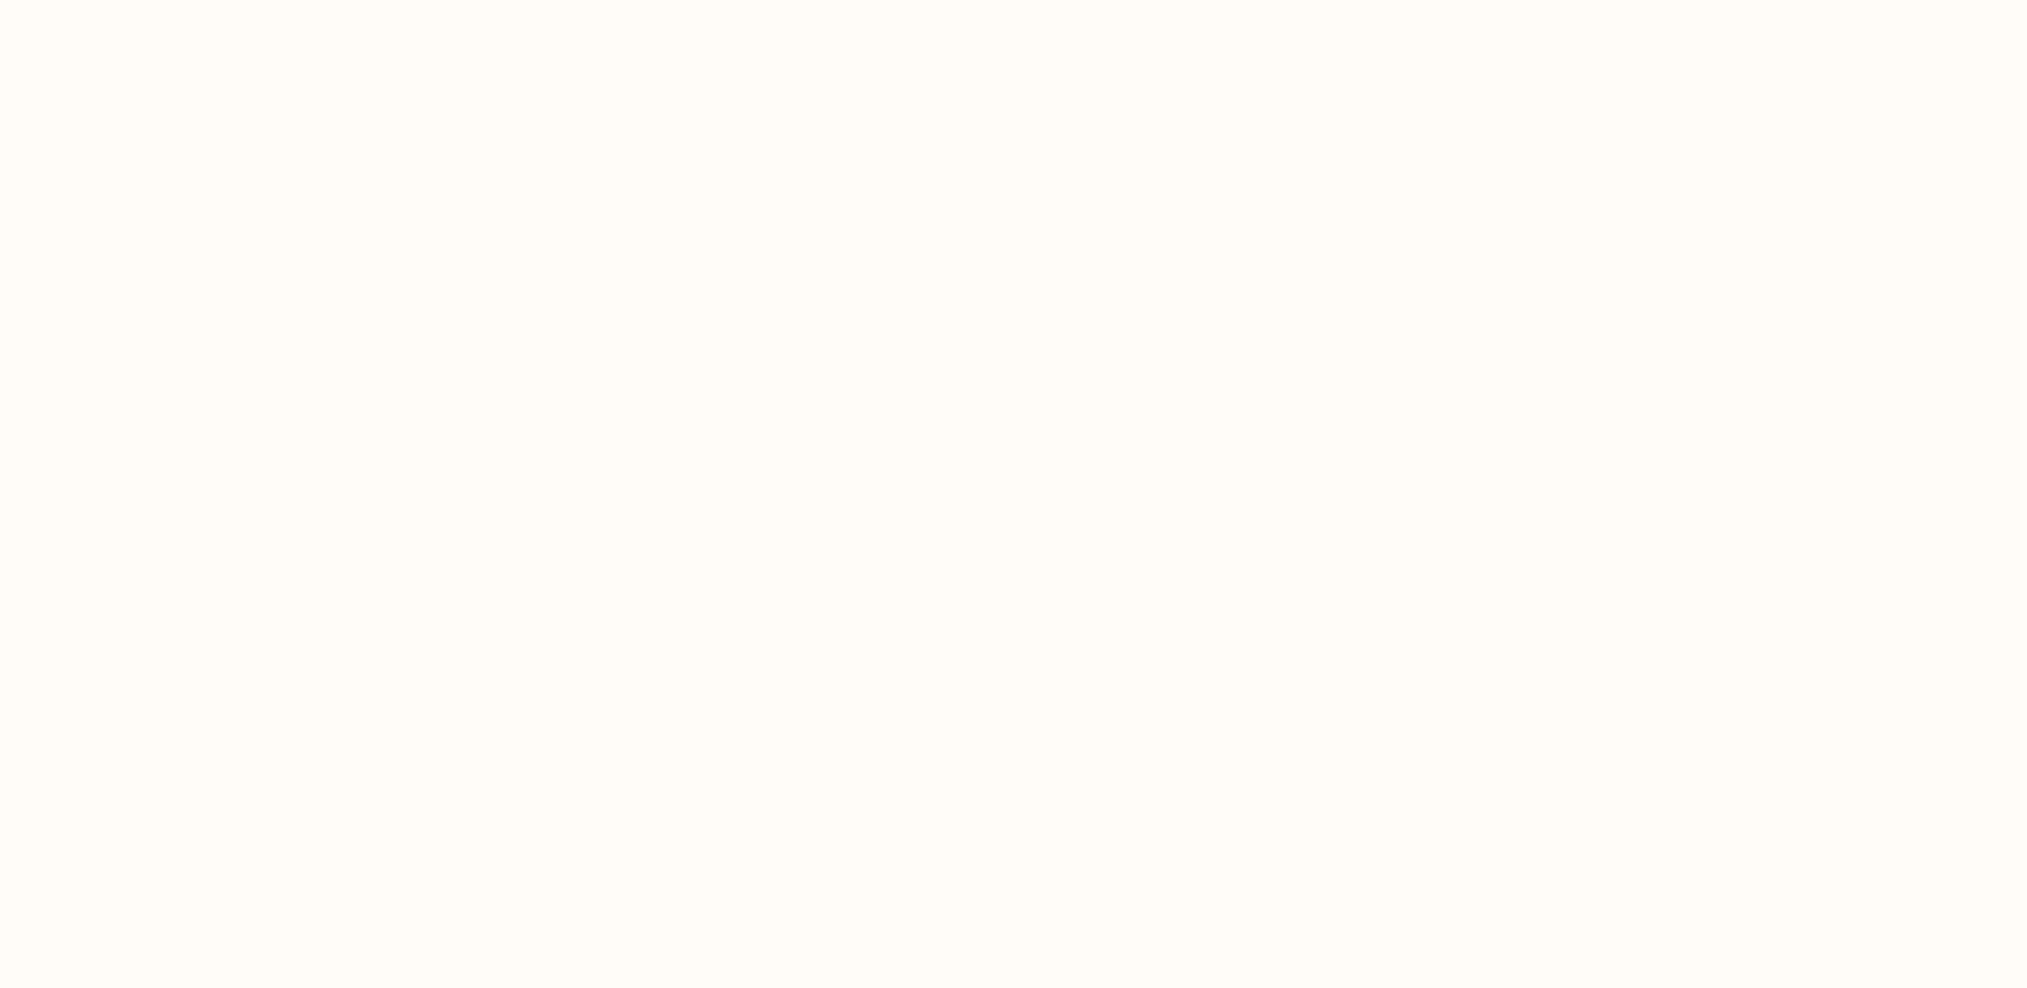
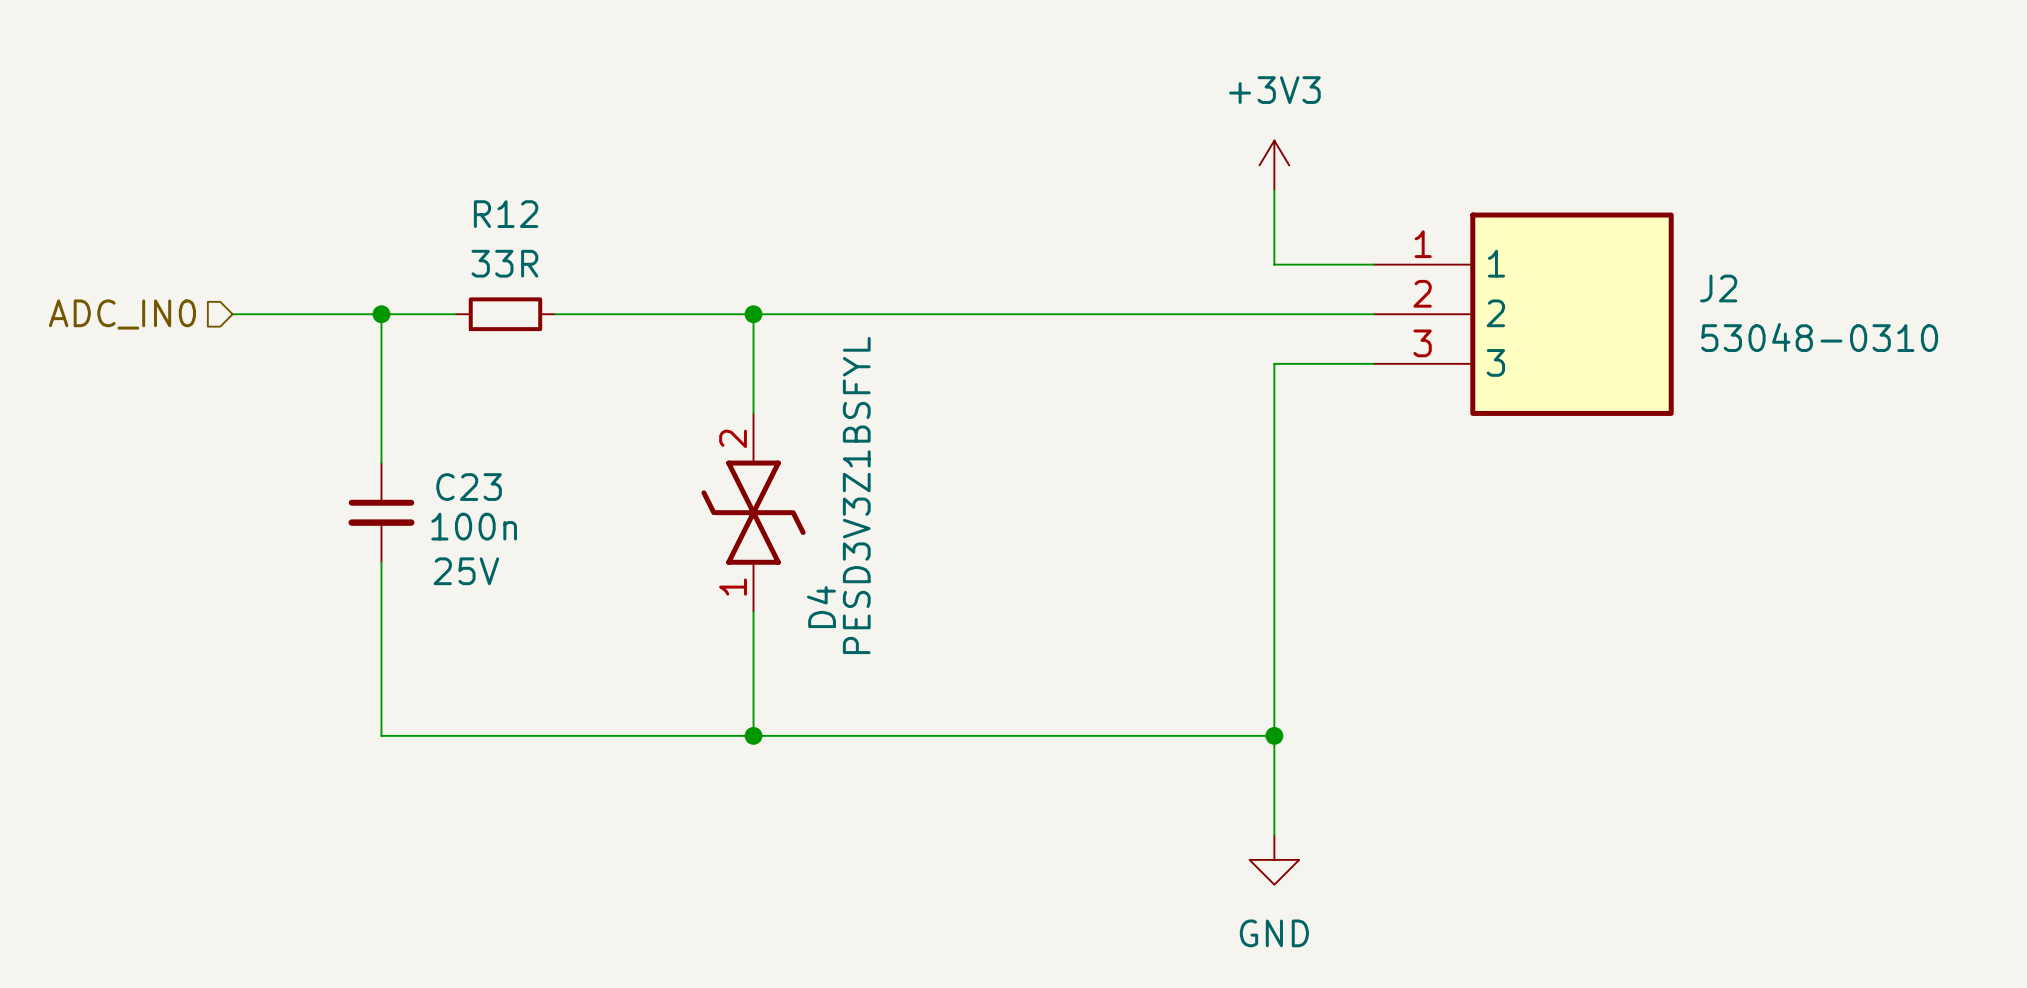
power symbol: none -> +3V3 (1274, 165)
wire: none -> (1274, 190) (1274, 264) (1373, 264)
wire: none -> (232, 314) (455, 314)
wire: none -> (381, 314) (381, 463)
junction: none -> (381, 314)
R12: none -> 33R (505, 314)
wire: none -> (555, 314) (1373, 314)
wire: none -> (753, 314) (753, 413)
junction: none -> (753, 314)
J2: none -> 53048-0310 (1523, 314)
hierarchical label: none -> ADC_IN0 (122, 314)
wire: none -> (1373, 363) (1274, 363) (1274, 835)
C23: none -> 100n (381, 512)
D4: none -> PESD3V3Z1BSFYL (753, 512)
wire: none -> (381, 562) (381, 735) (1274, 735)
wire: none -> (753, 611) (753, 735)
junction: none -> (753, 735)
junction: none -> (1274, 735)
power symbol: none -> GND (1274, 859)

